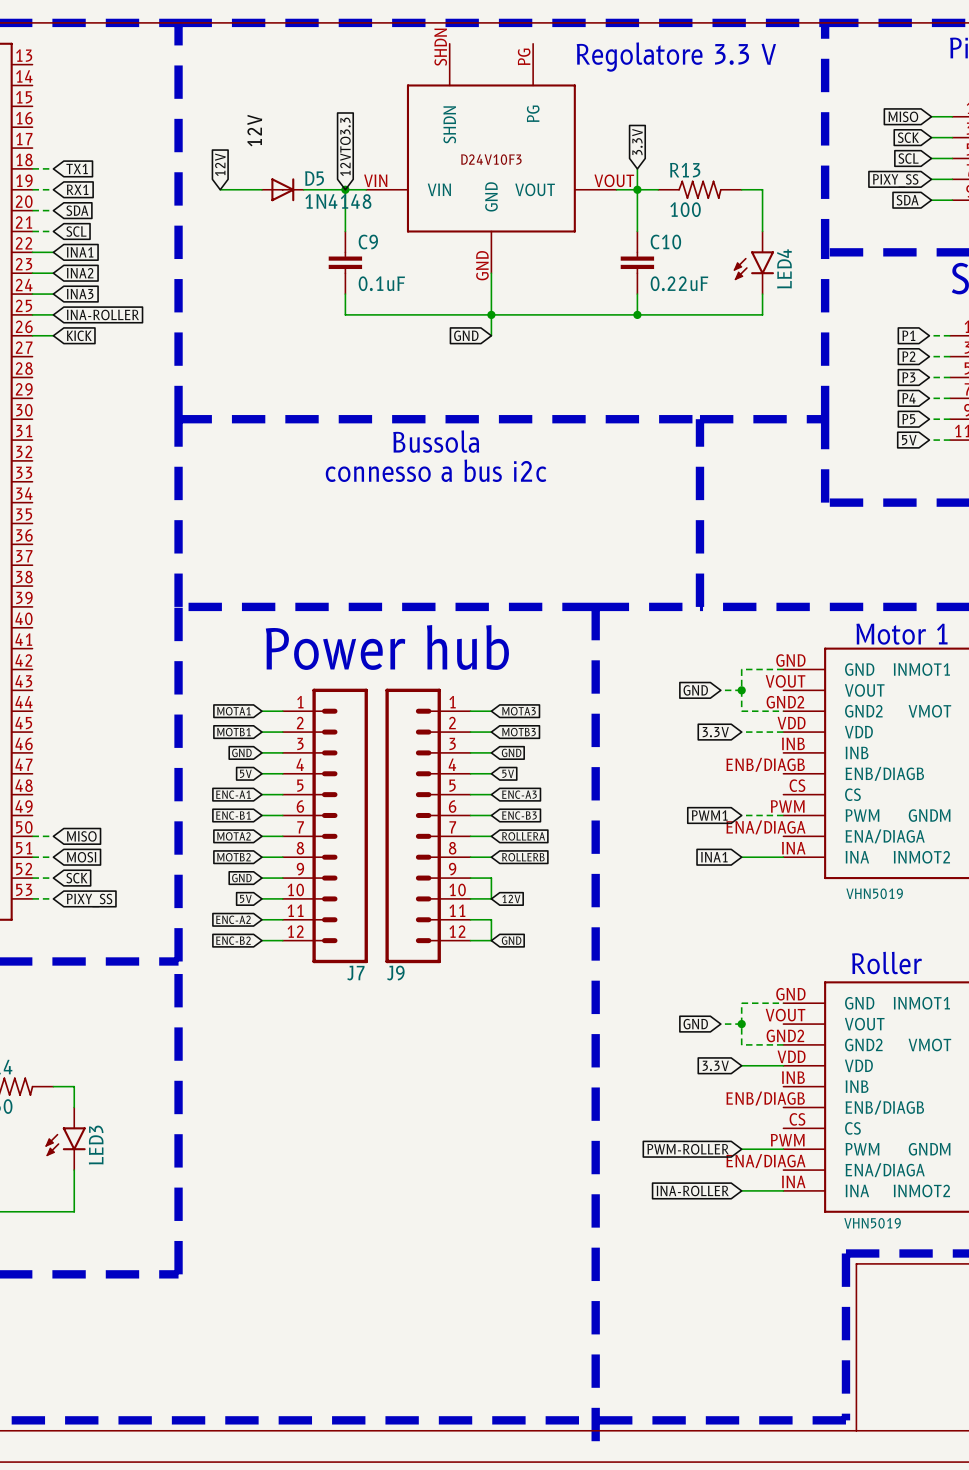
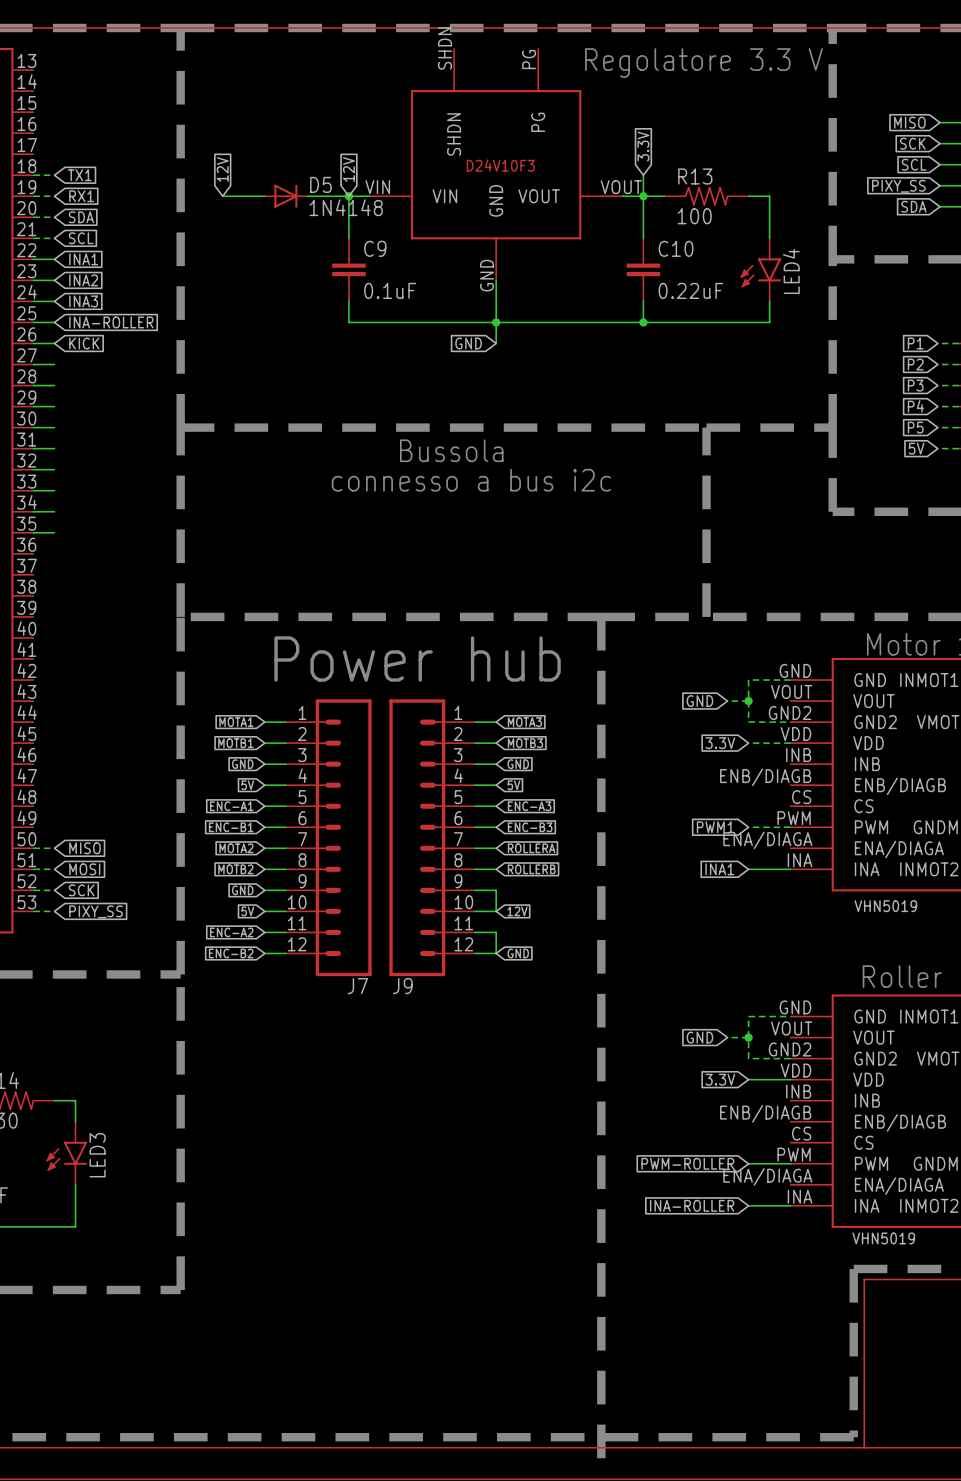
label: 12V (254, 130) -> none
global label: 12VTO3.3 (345, 146) -> 12V (348, 169)
wire: none -> (33, 364) (54, 364)
wire: none -> (33, 385) (54, 385)
wire: none -> (33, 406) (54, 406)
wire: none -> (33, 427) (54, 427)
wire: none -> (33, 448) (54, 448)
wire: none -> (33, 469) (54, 469)
wire: none -> (33, 490) (54, 490)
wire: none -> (33, 511) (54, 511)
wire: none -> (33, 532) (54, 532)

